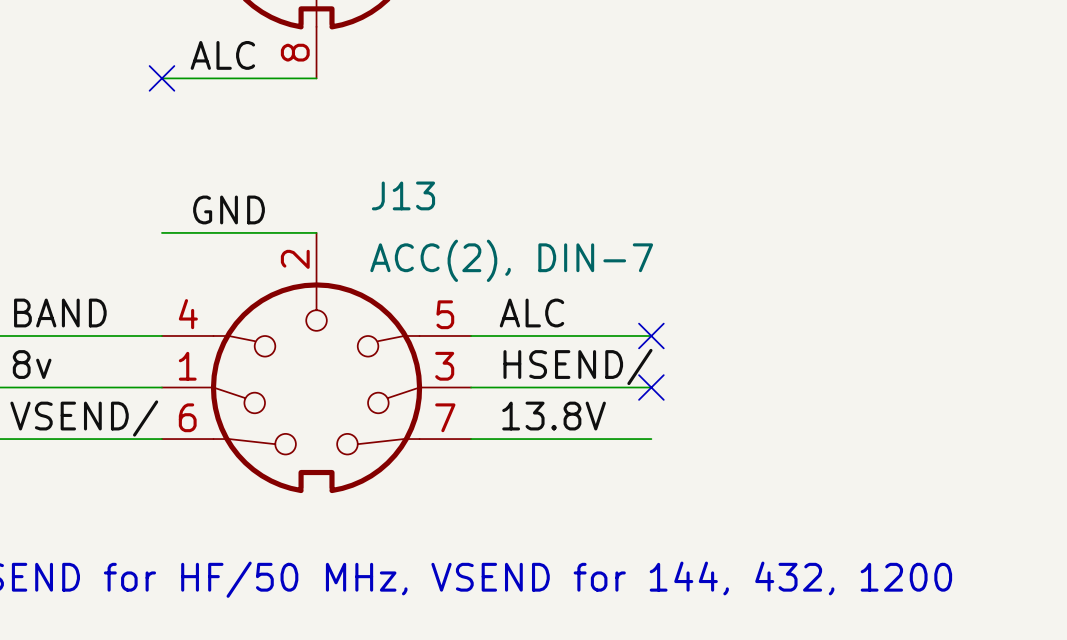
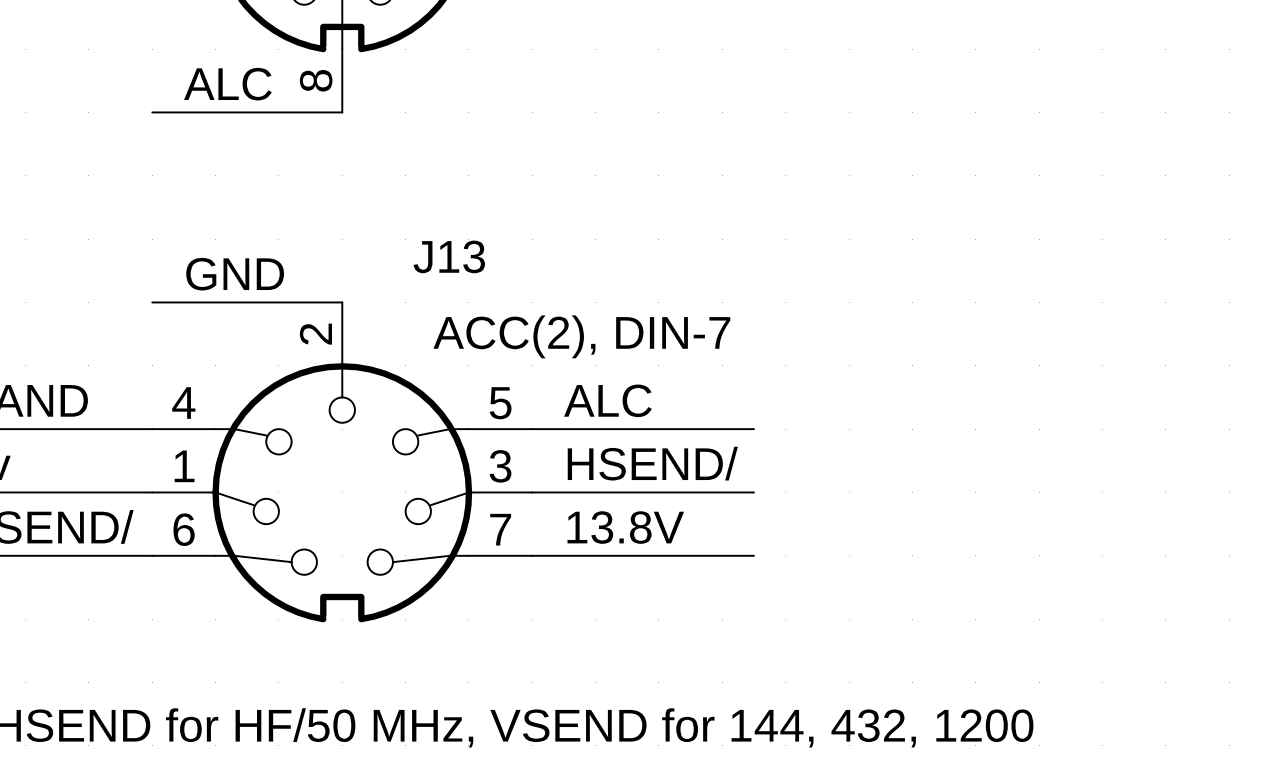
no-connect mark: (161, 78) -> none
no-connect mark: (651, 335) -> none
no-connect mark: (651, 387) -> none

